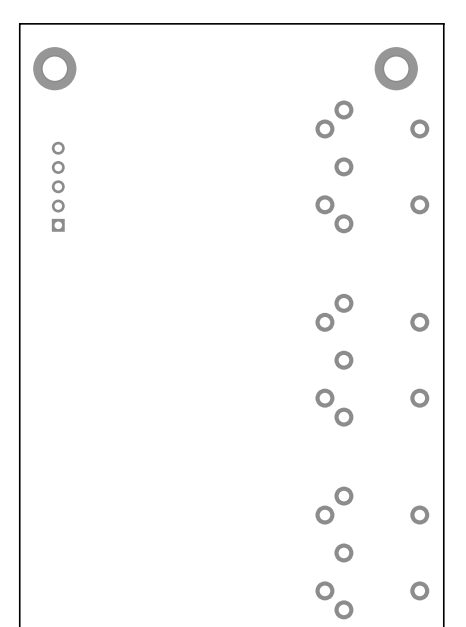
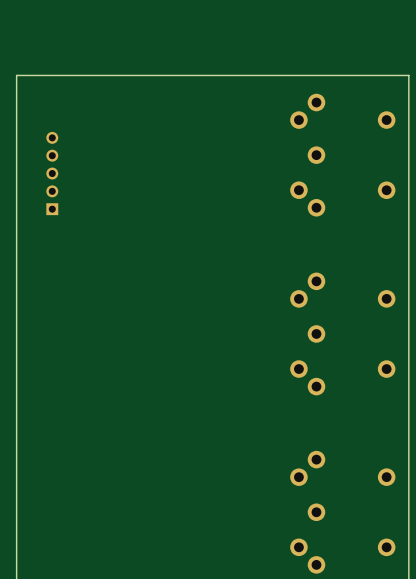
part: (54, 68) -> none
part: (396, 68) -> none
board edge: (443, 80) (443, 23) (19, 23) (19, 80) -> (408, 75) (16, 75)

